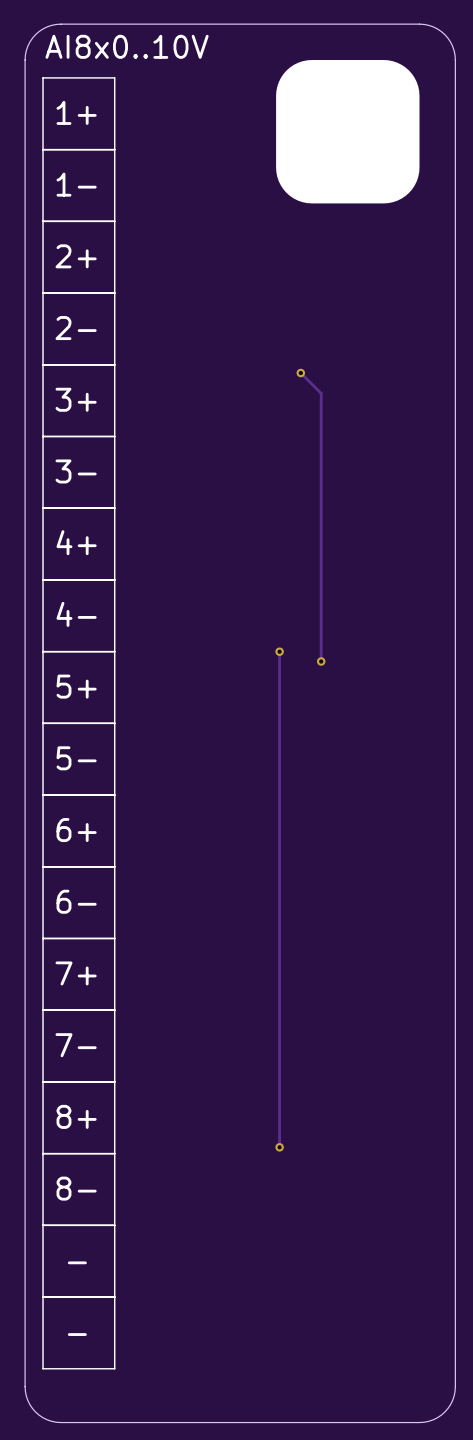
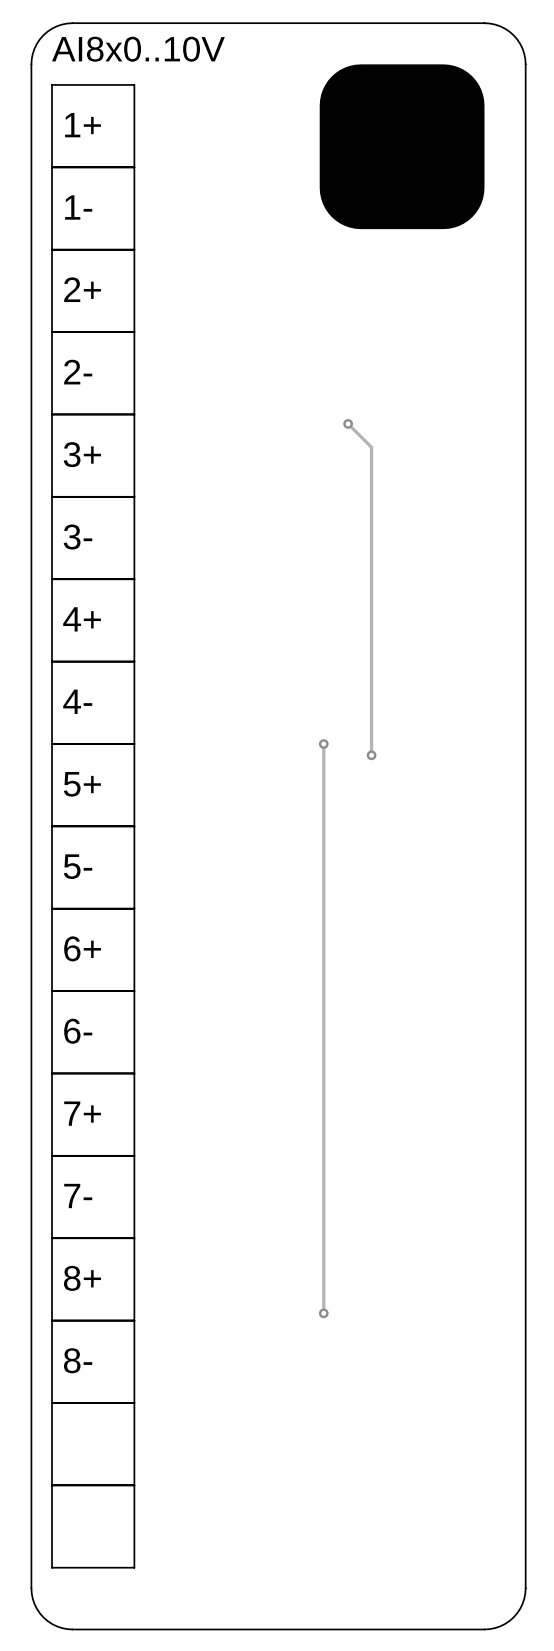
text: - (77, 1262) -> none
text: - (77, 1334) -> none

